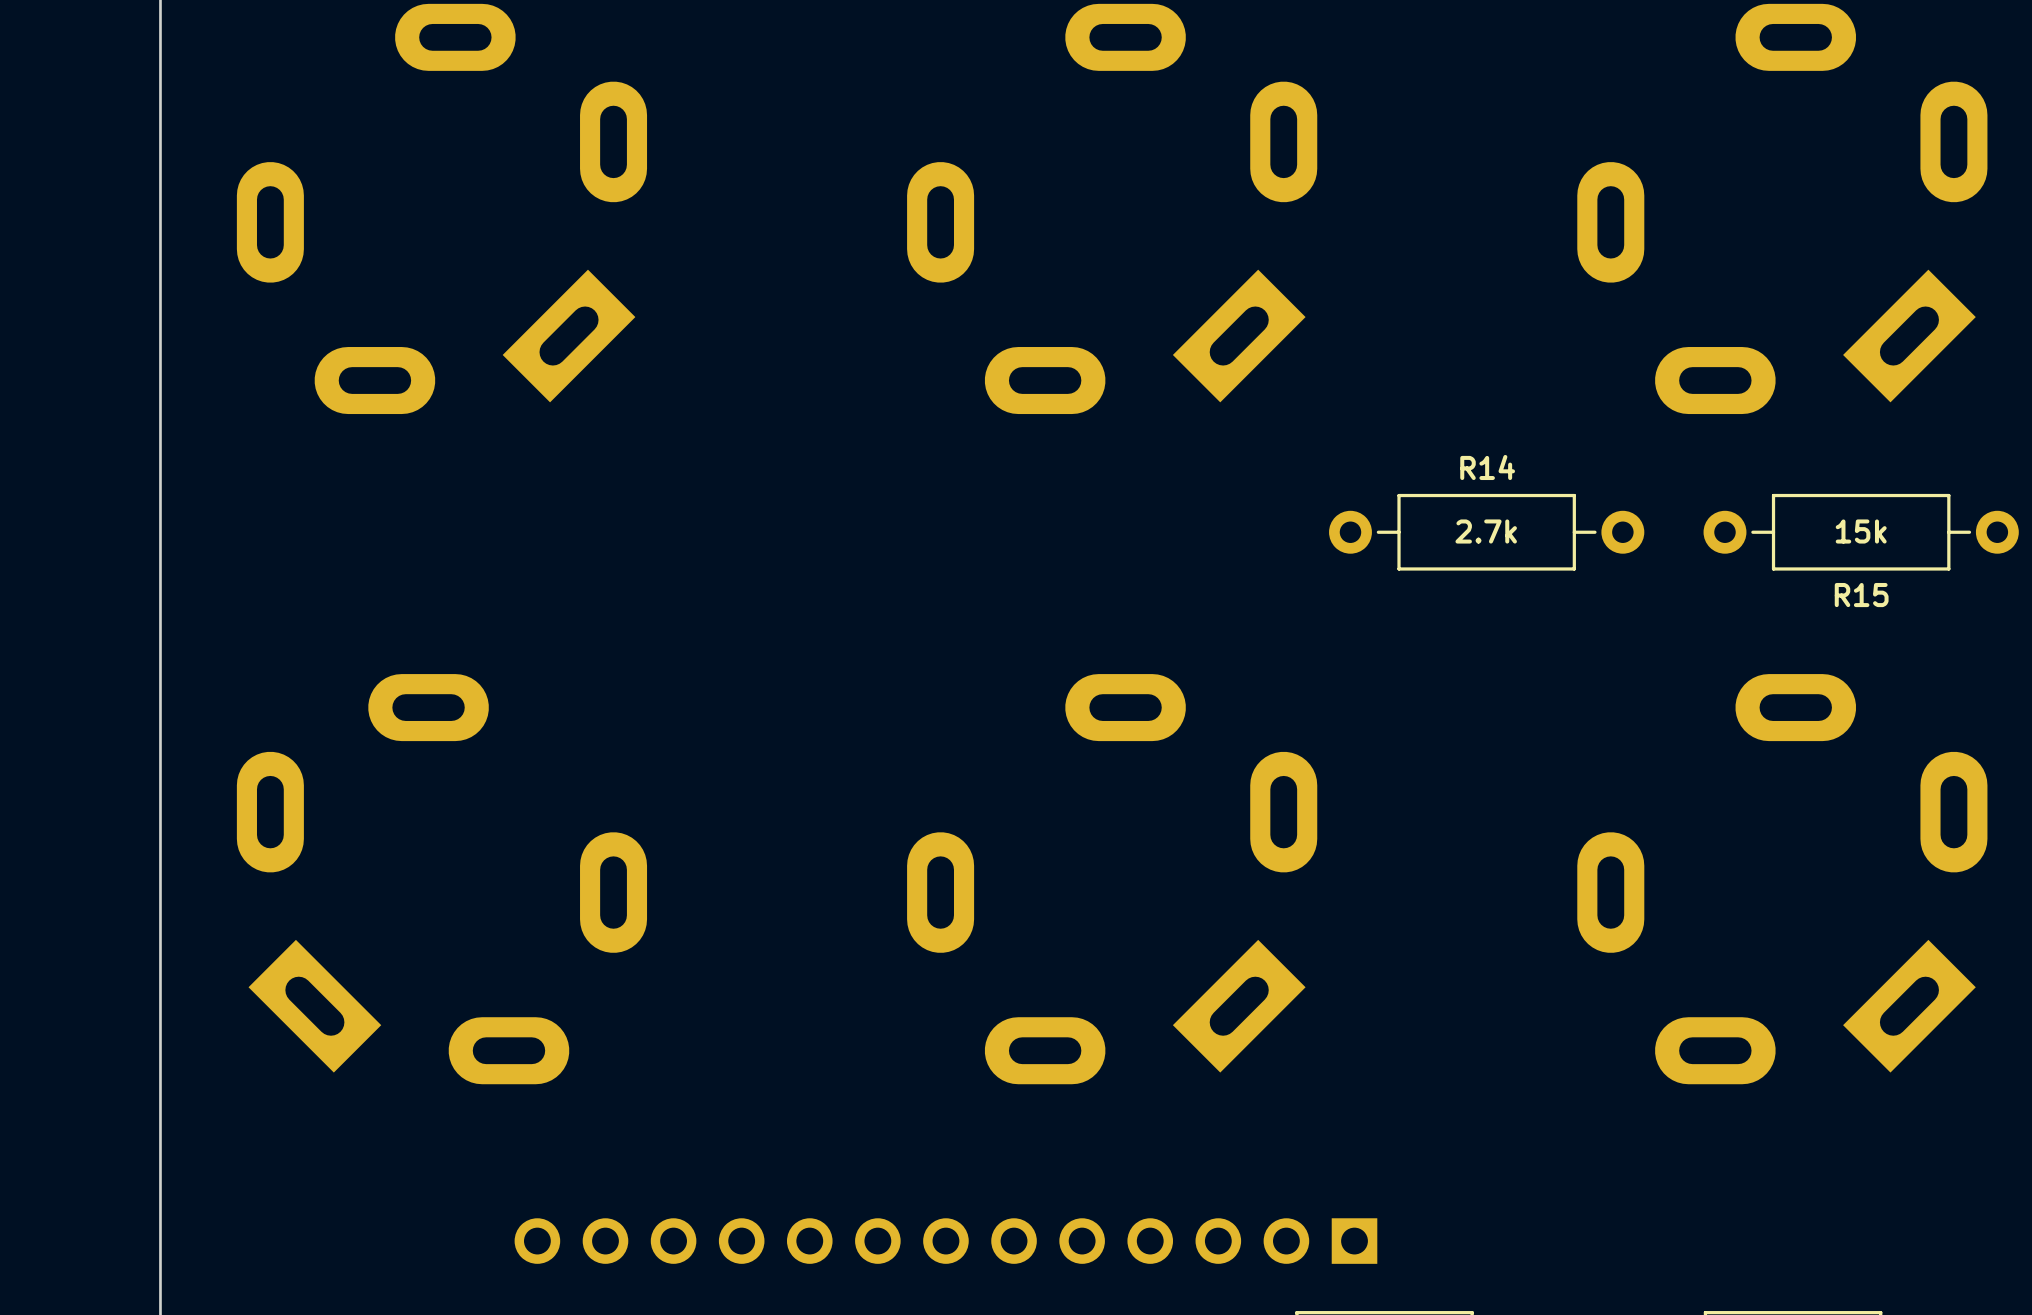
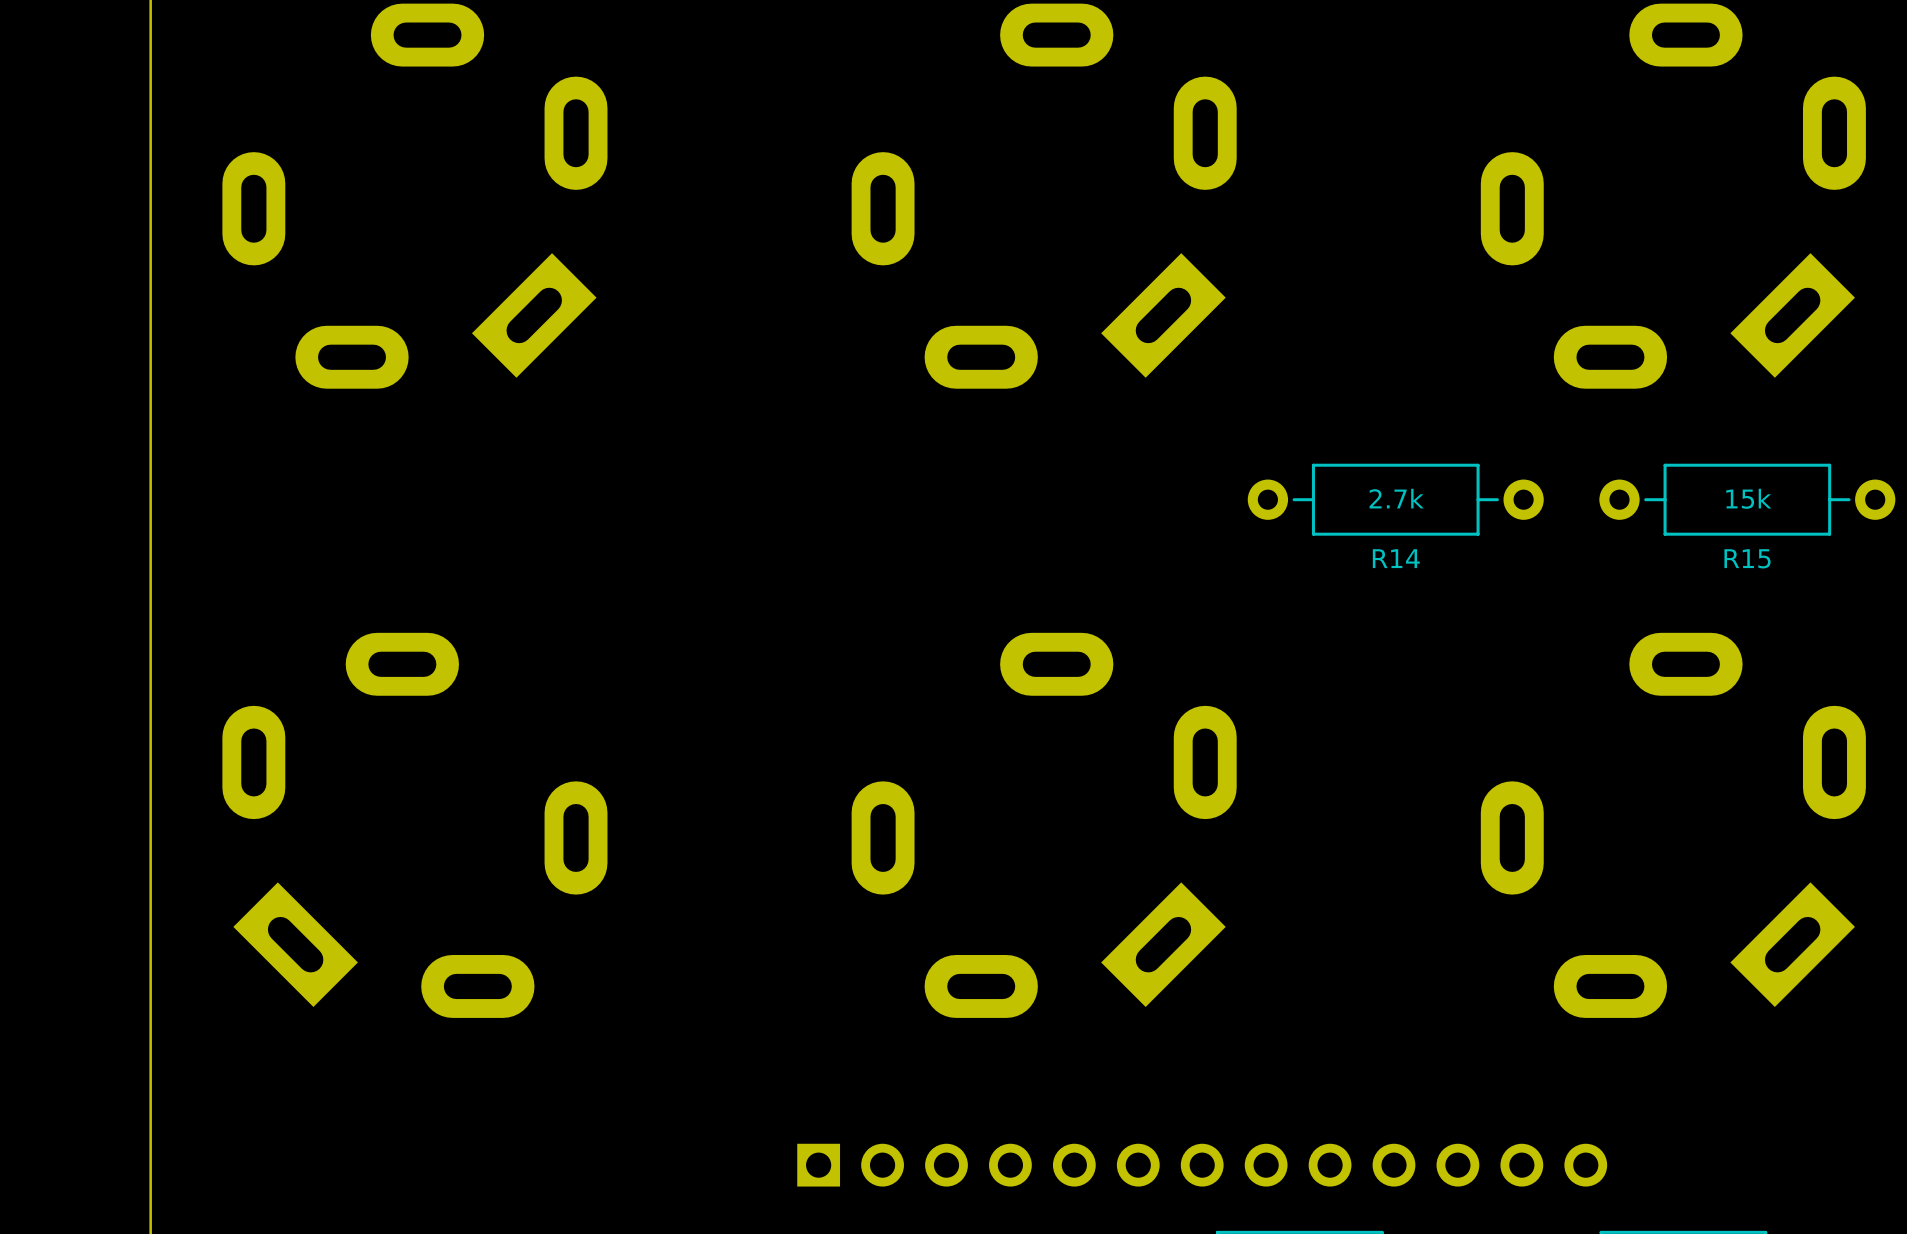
R14 name position: R14 (1487, 467) -> R14 (1396, 558)
part rotation: 0° (945, 1241) -> 180° (1202, 1165)

